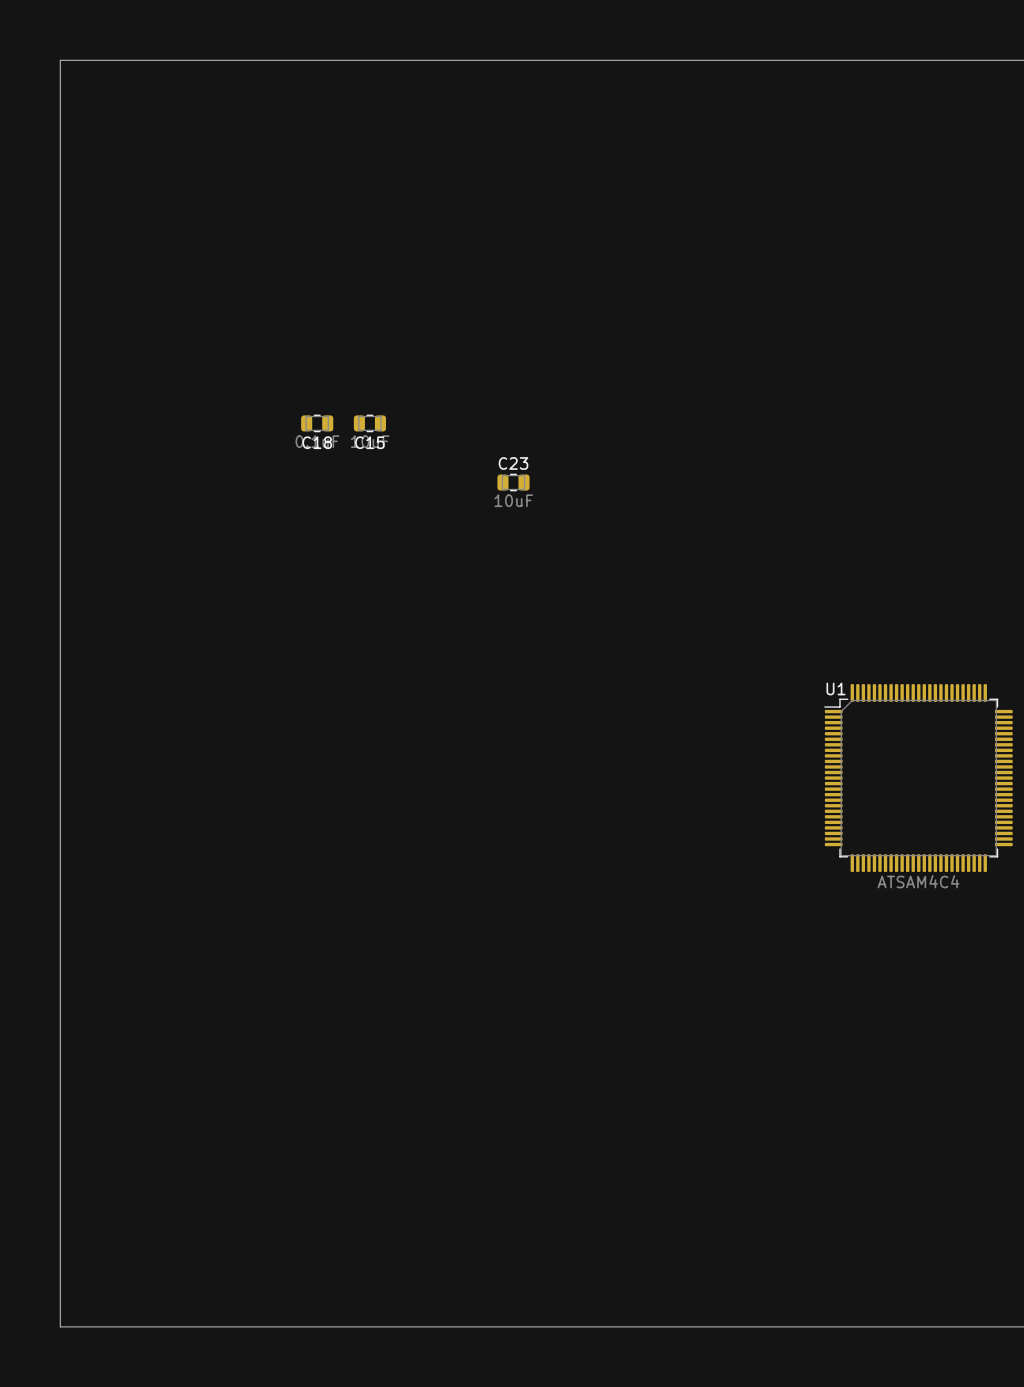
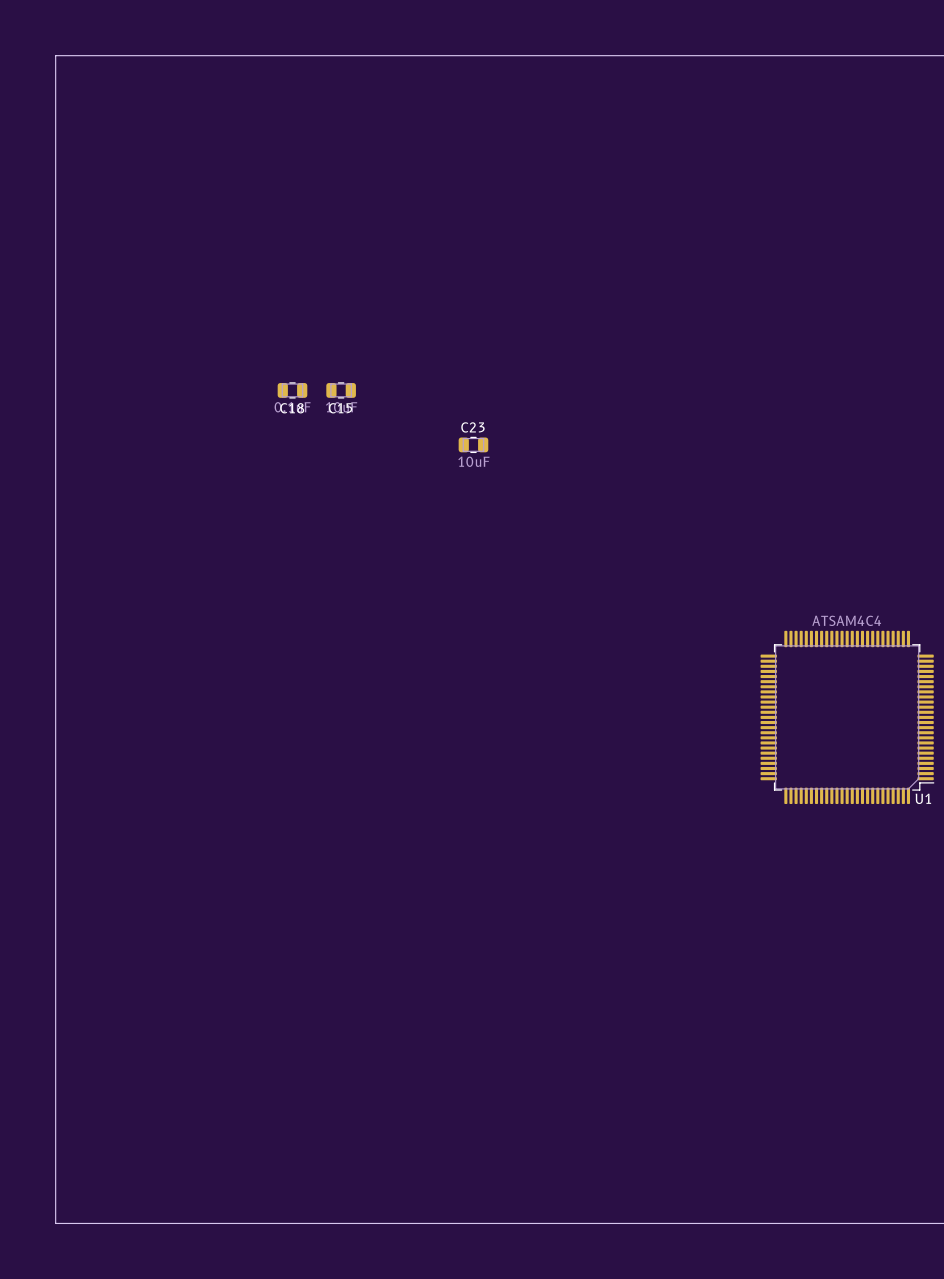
U1 rotation: 0° (918, 778) -> 180° (847, 717)

